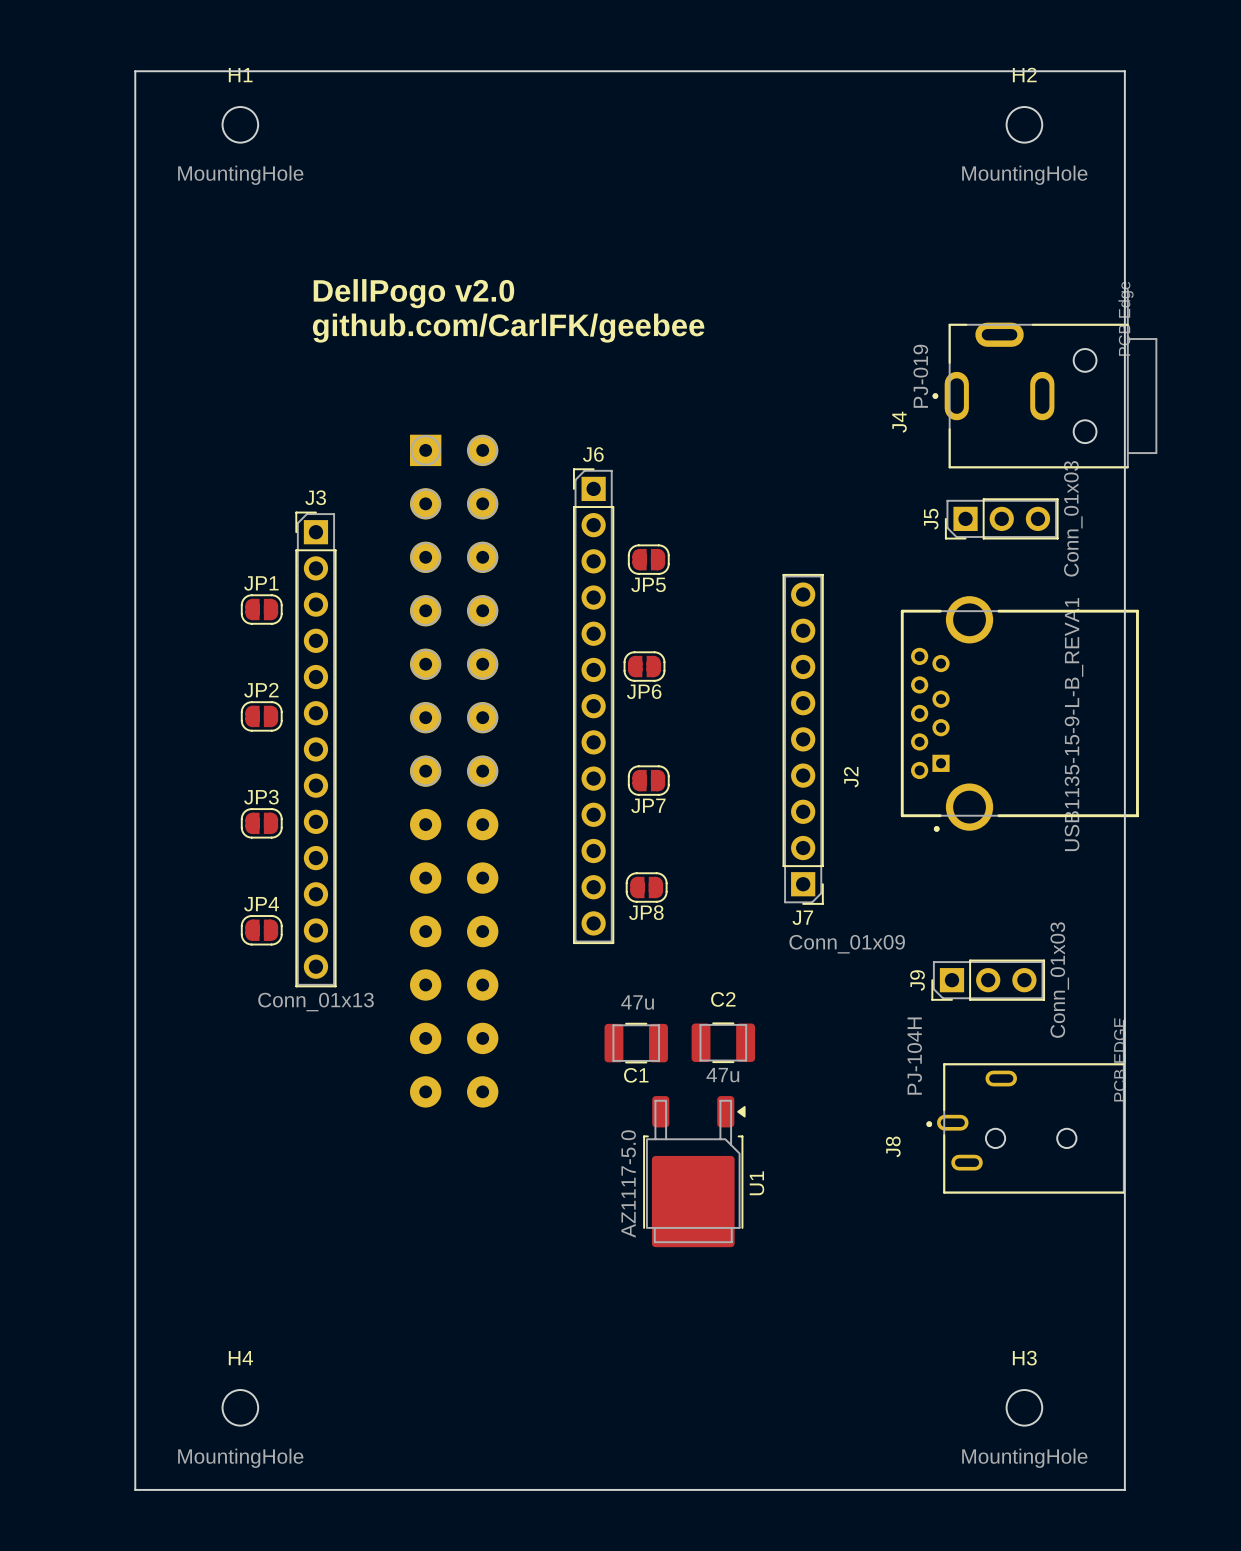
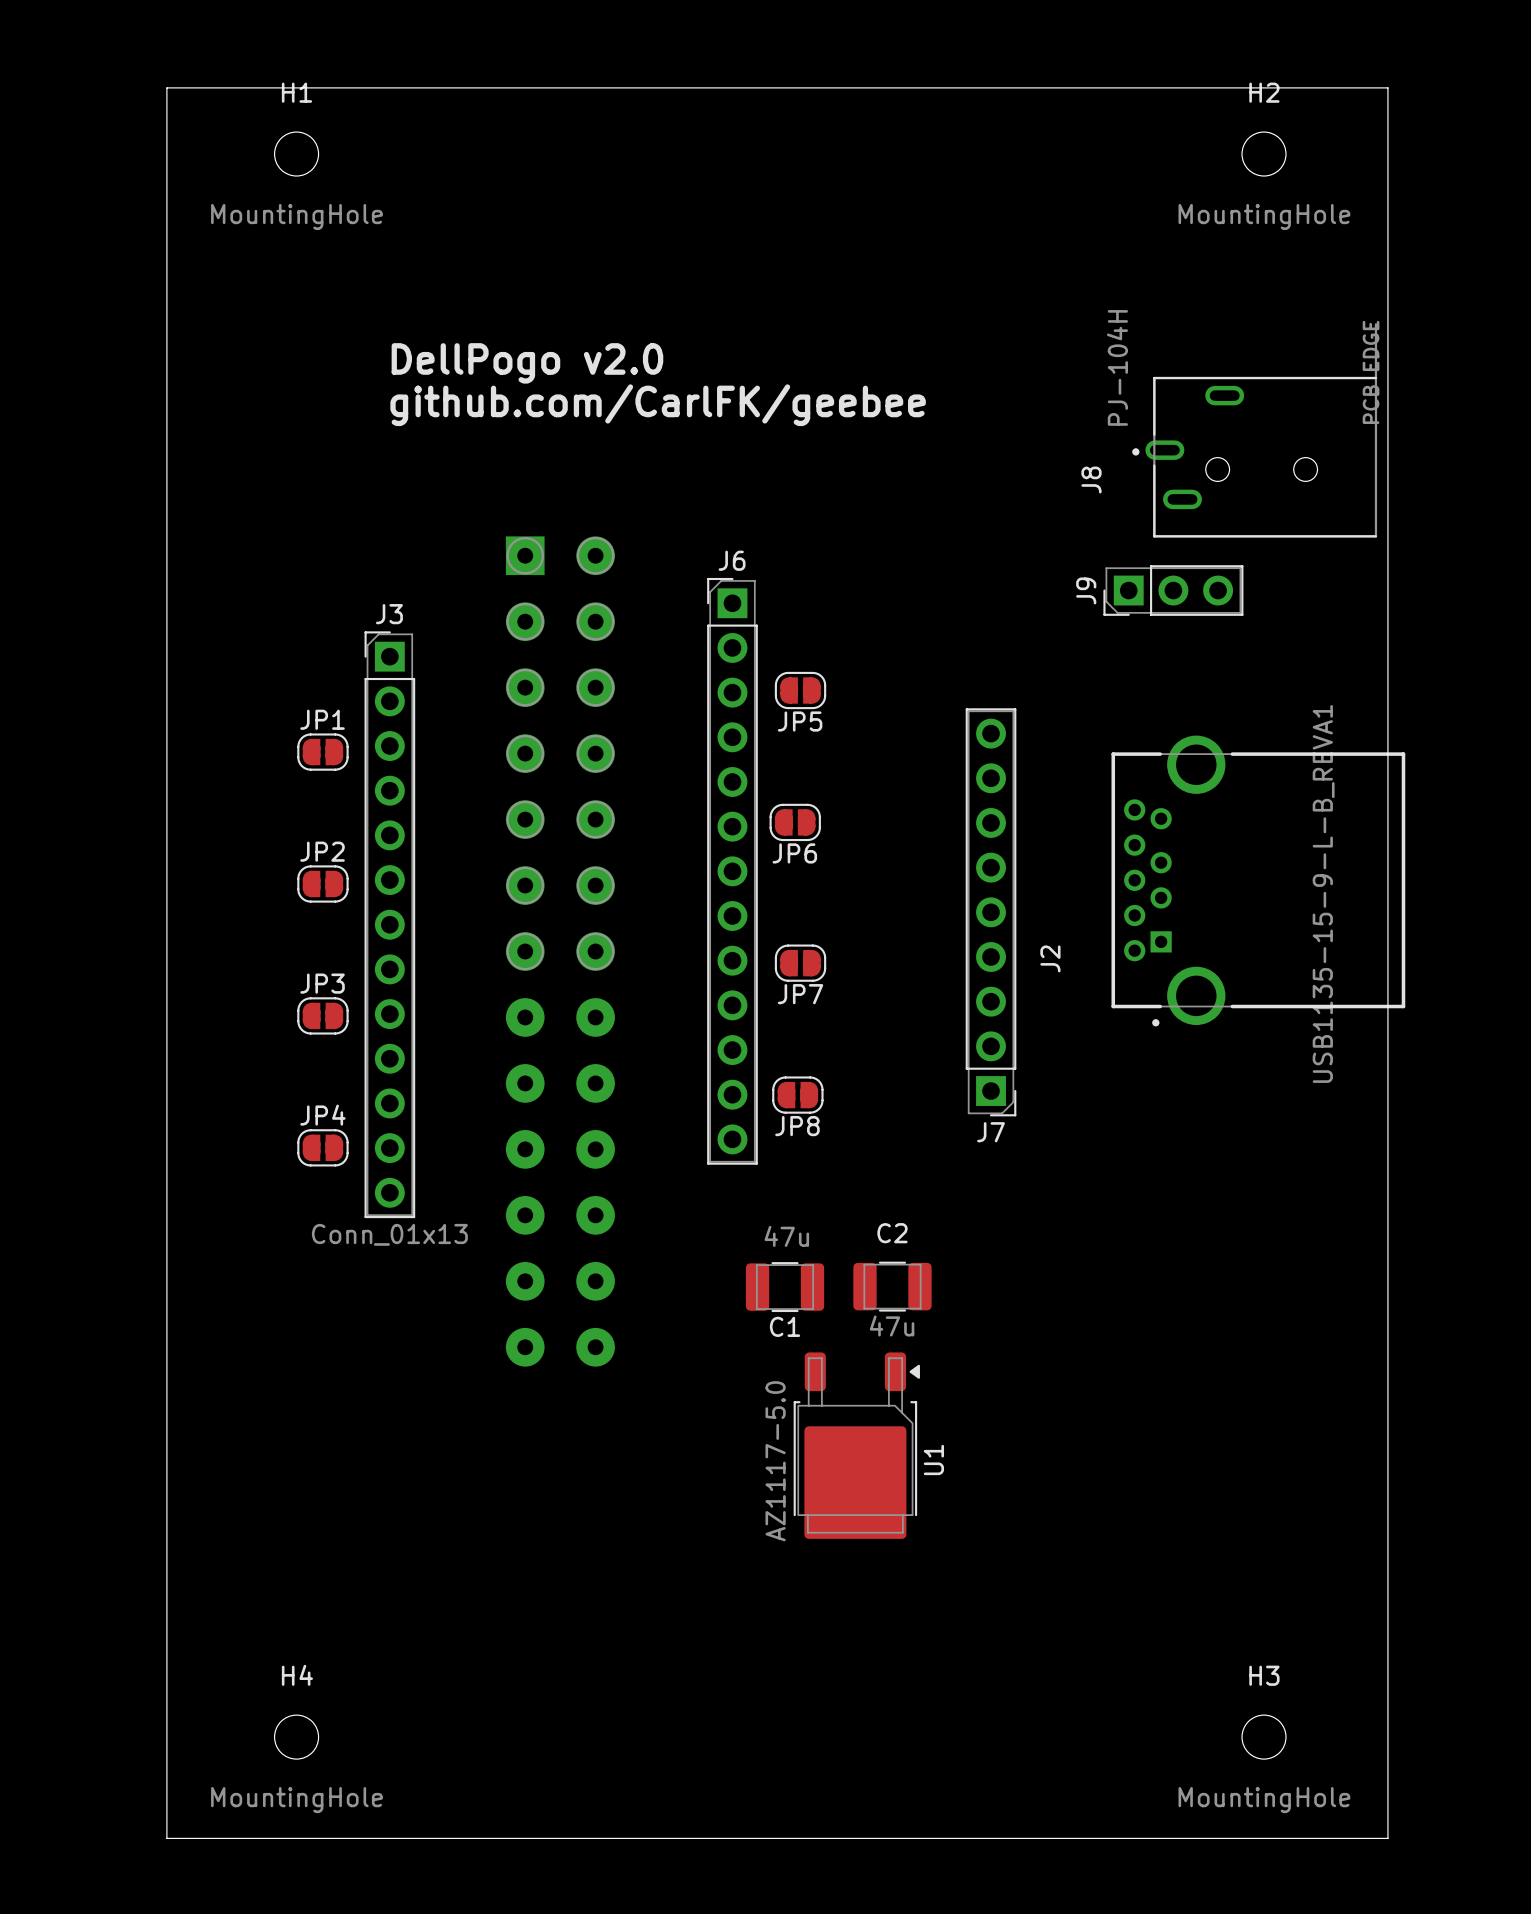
J4: PJ-019 (1044, 378) -> none
J5: Conn_01x03 (1001, 518) -> none
J7 value: Conn_01x09 (847, 944) -> none
J9 position: (988, 980) -> (1173, 590)
J9 value: Conn_01x03 (1059, 980) -> none
J8 position: (1025, 1106) -> (1254, 430)

